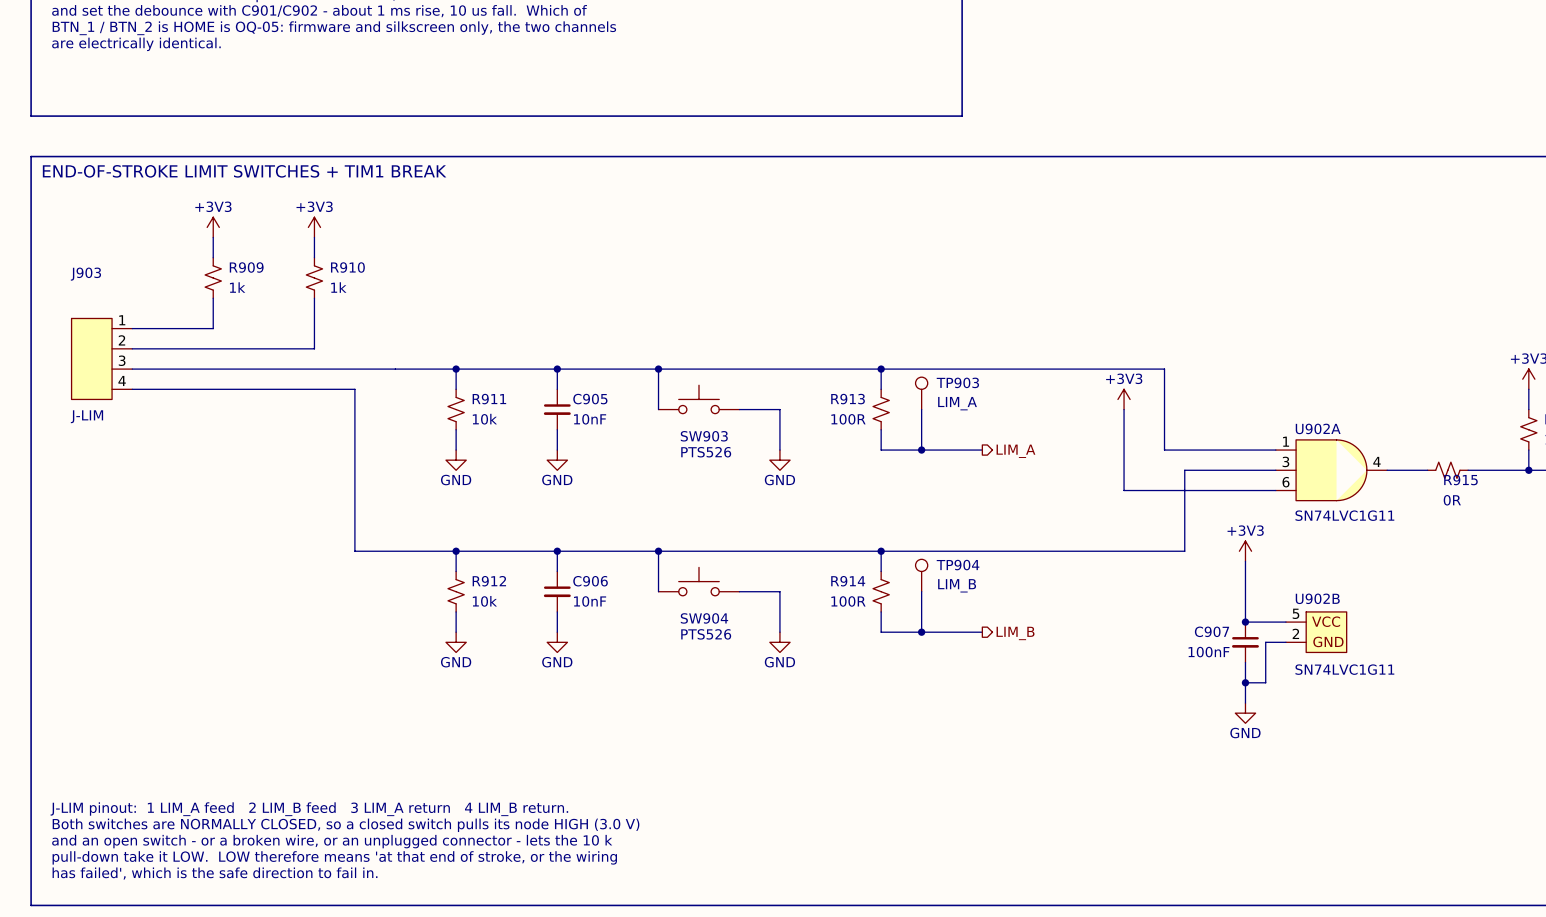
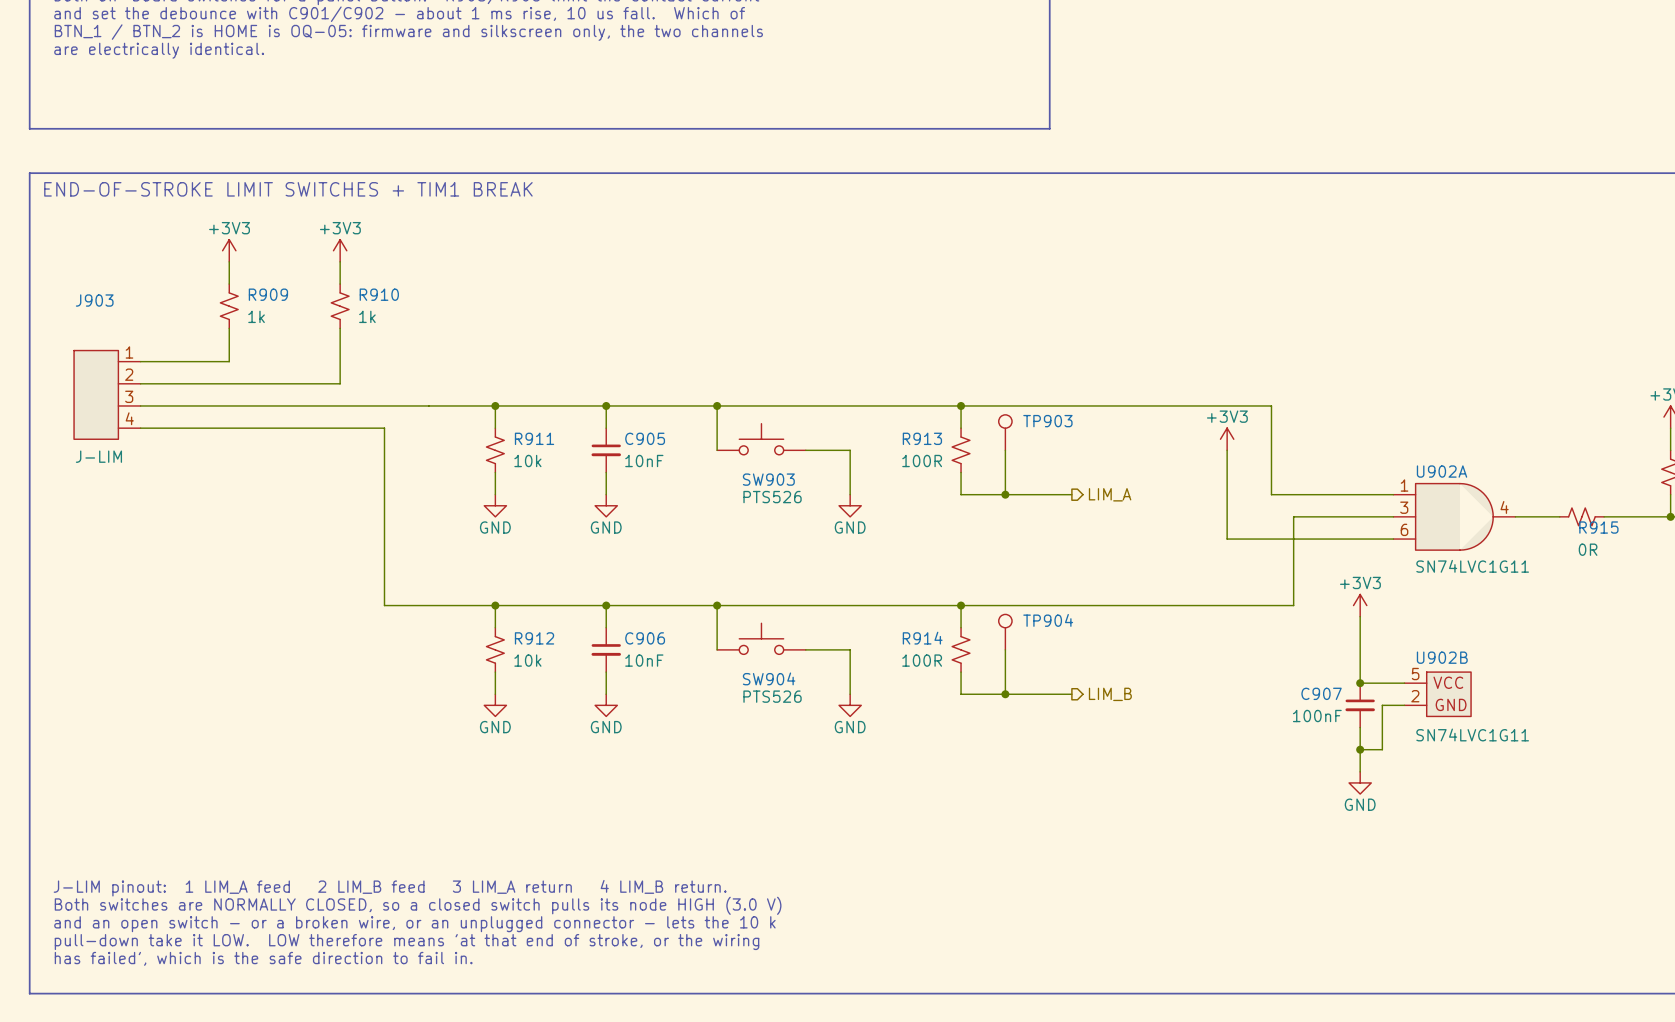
TP903 value: LIM_A (957, 403) -> none
TP904 value: LIM_B (957, 585) -> none

